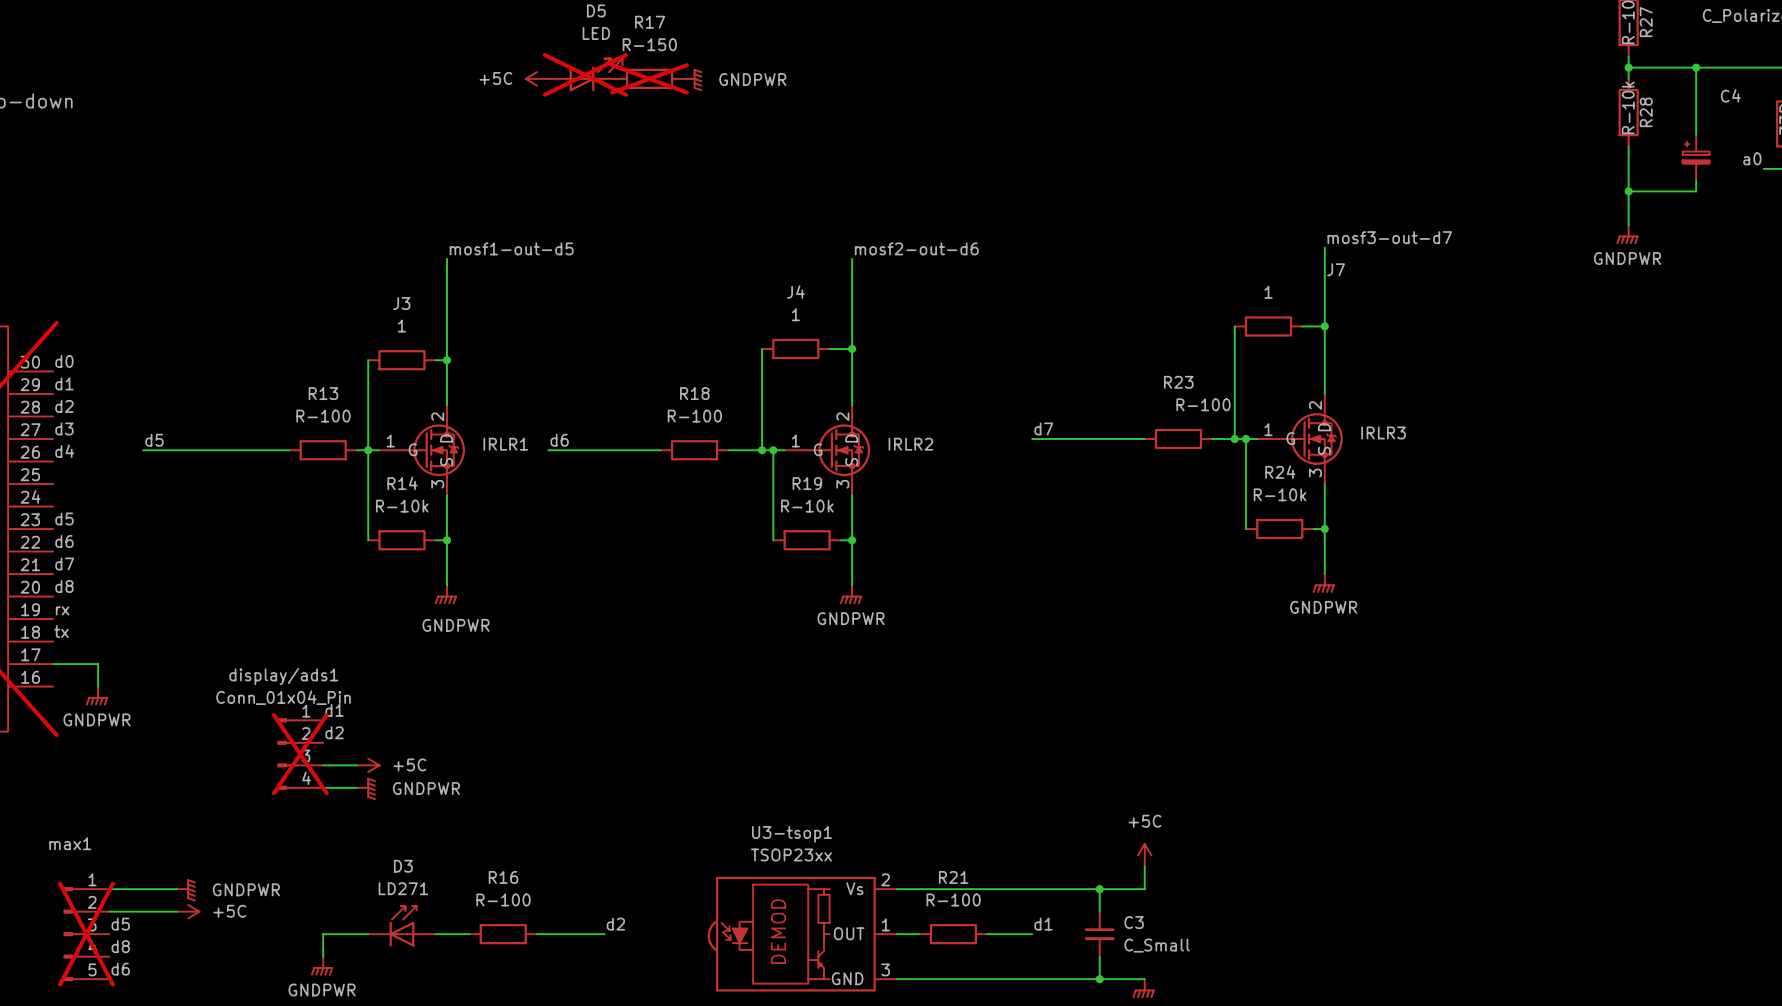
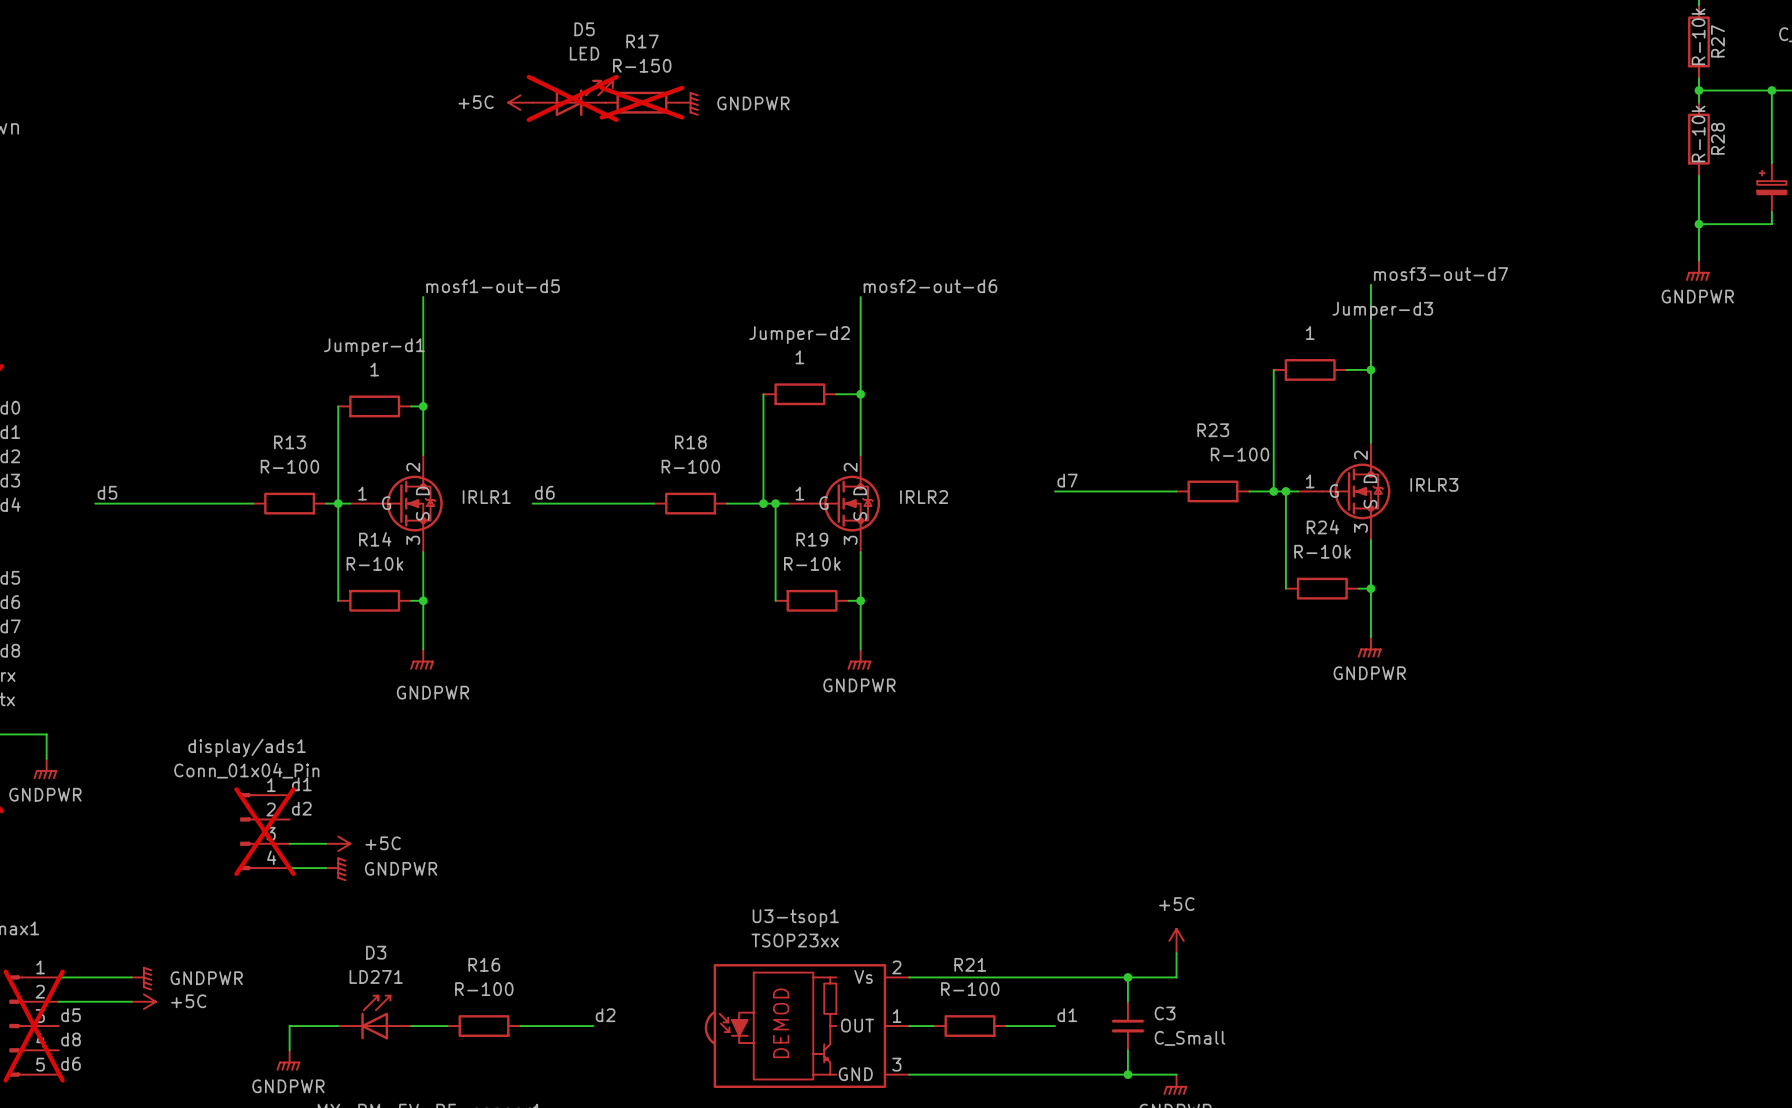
J7 name: J7 (1336, 269) -> Jumper-d3 (1382, 310)
J4 name: J4 (795, 292) -> Jumper-d2 (799, 335)
J3 name: J3 (401, 303) -> Jumper-d1 (374, 347)

